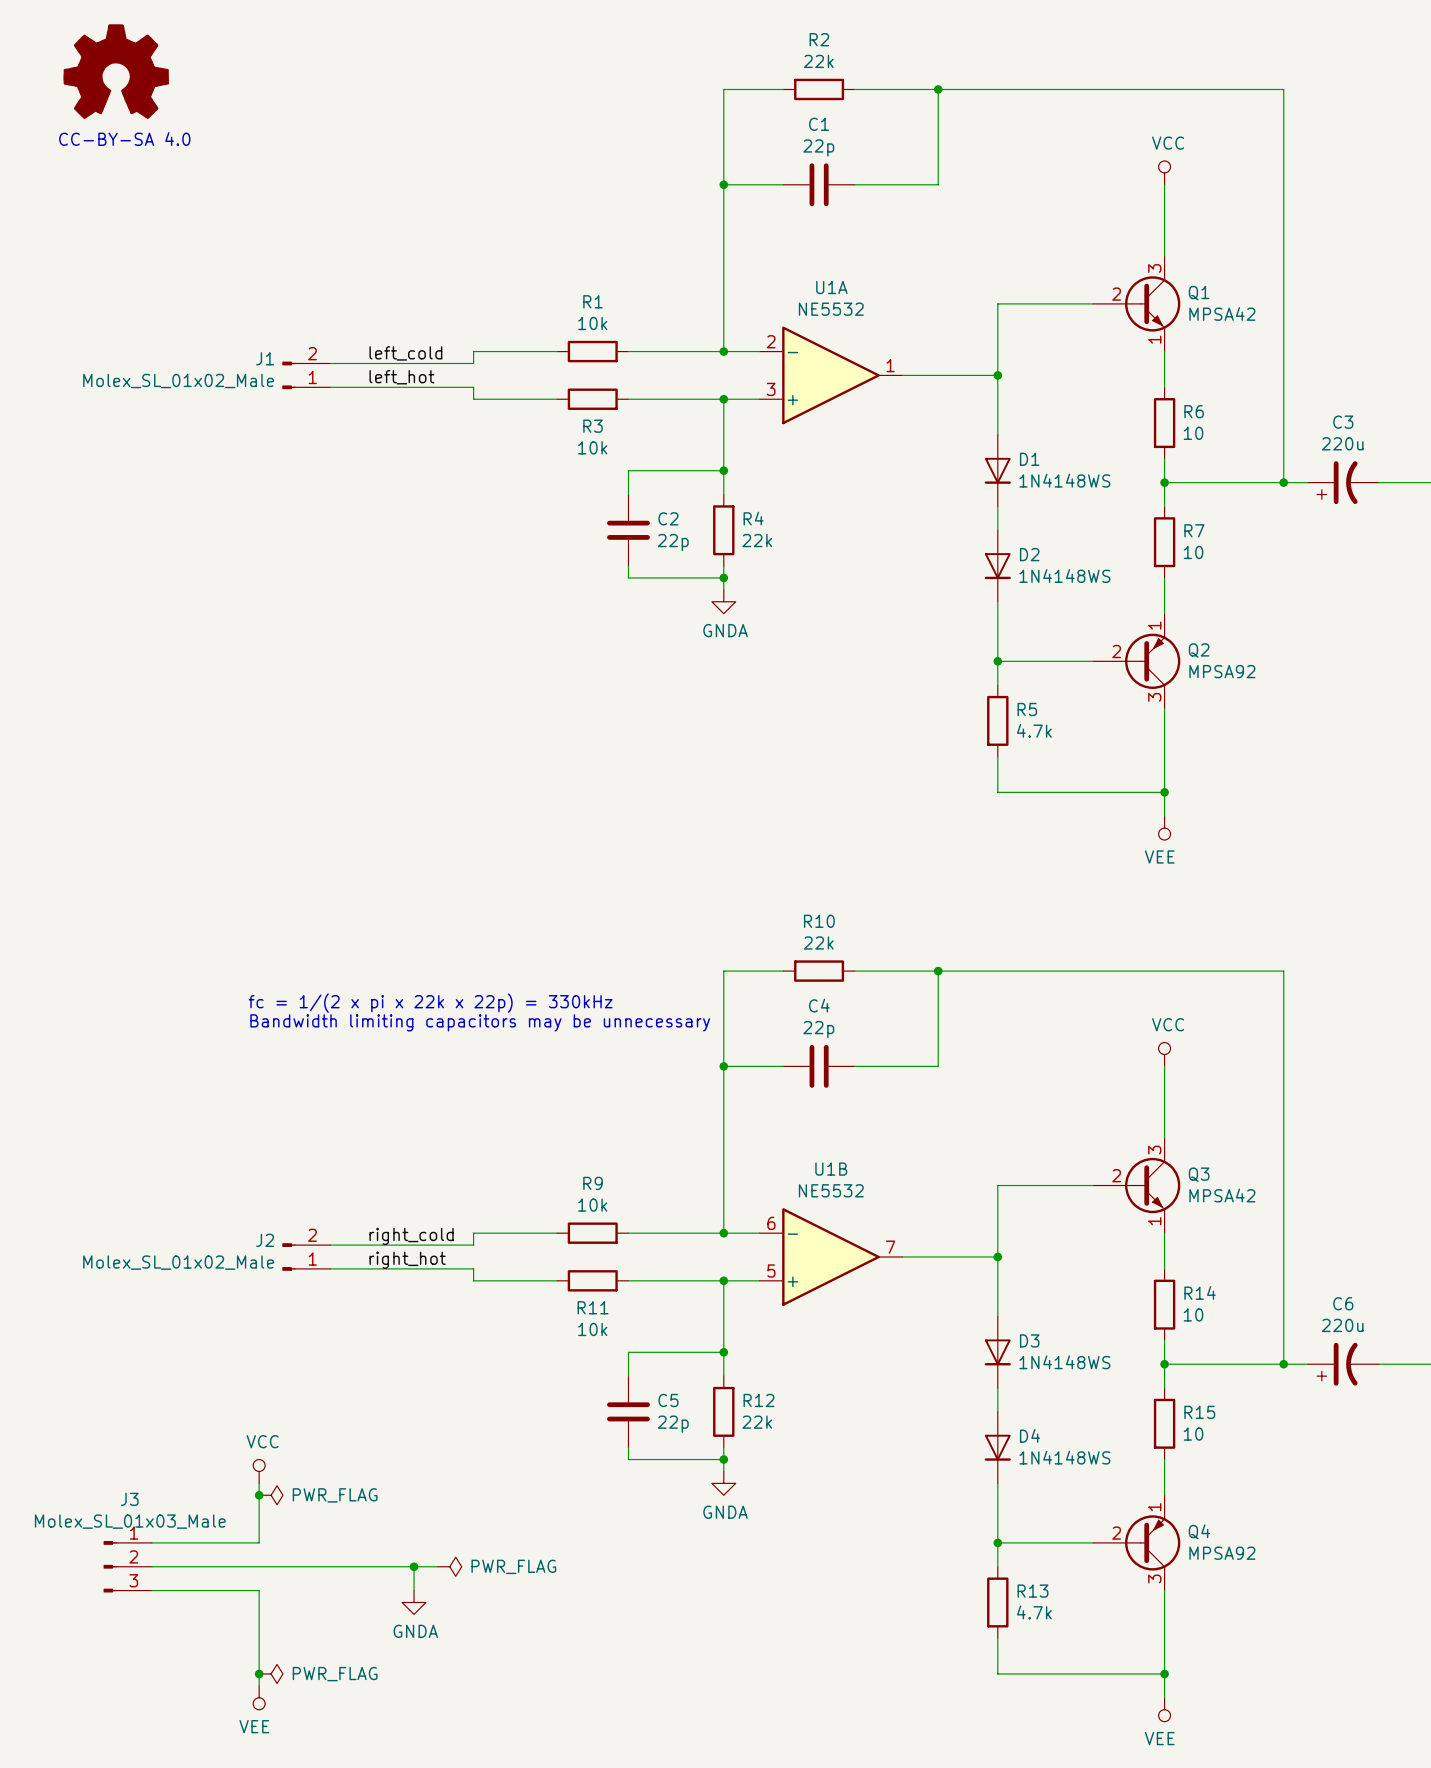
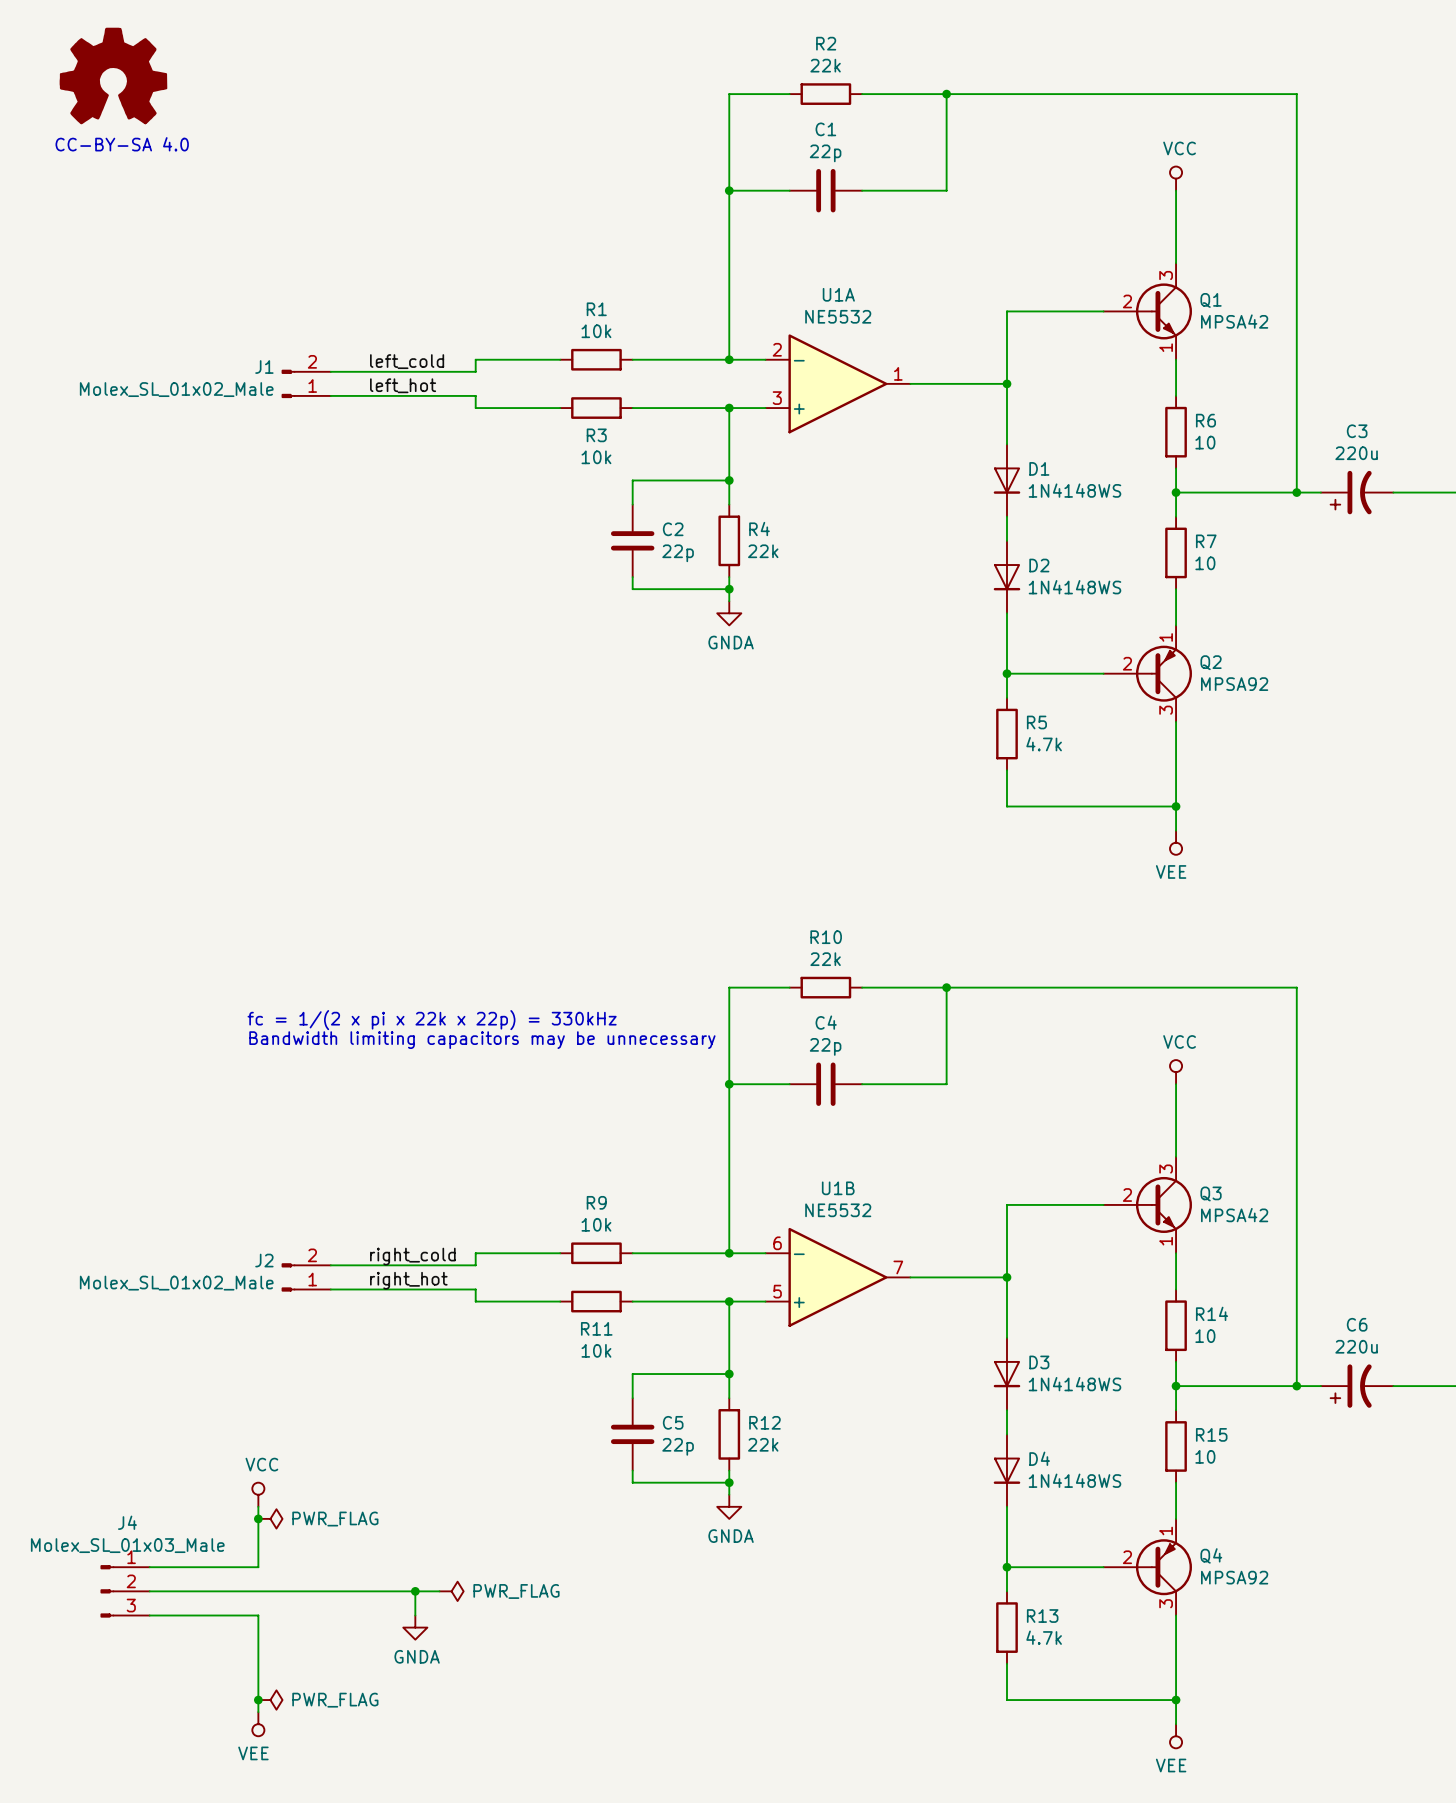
J3 name: J3 (129, 1499) -> J4 (127, 1522)

